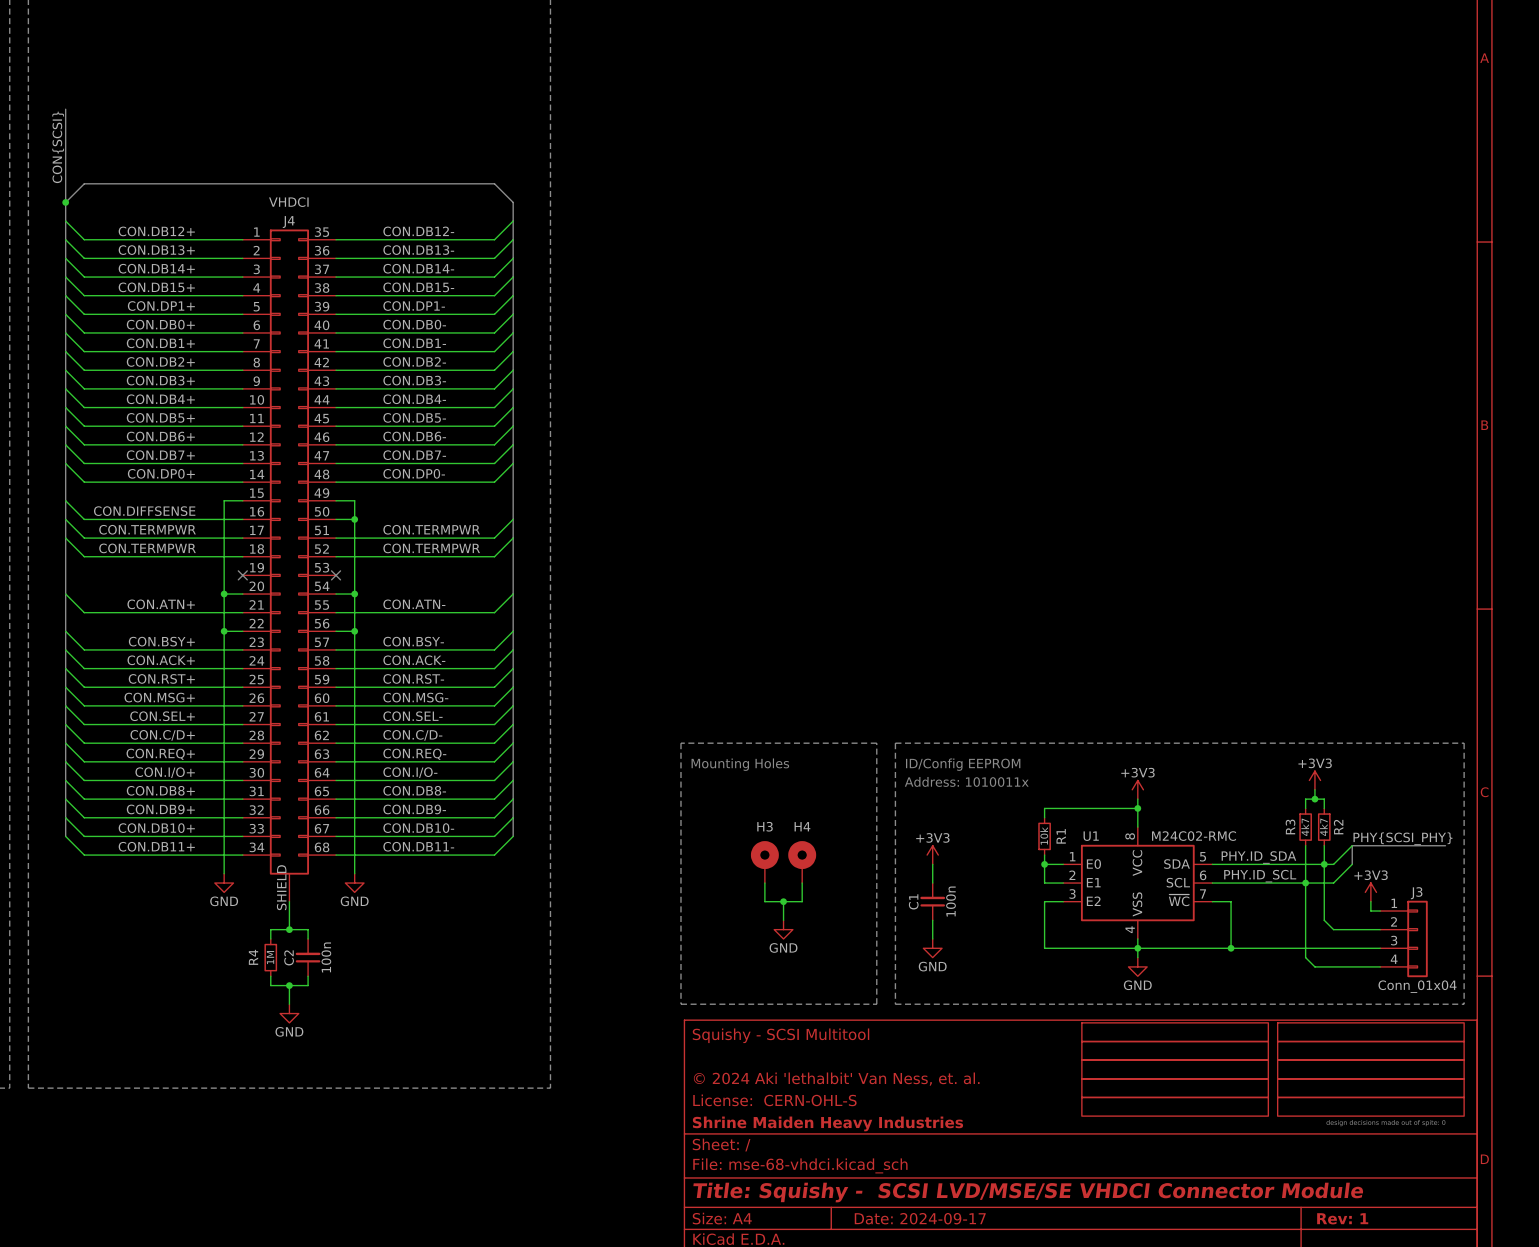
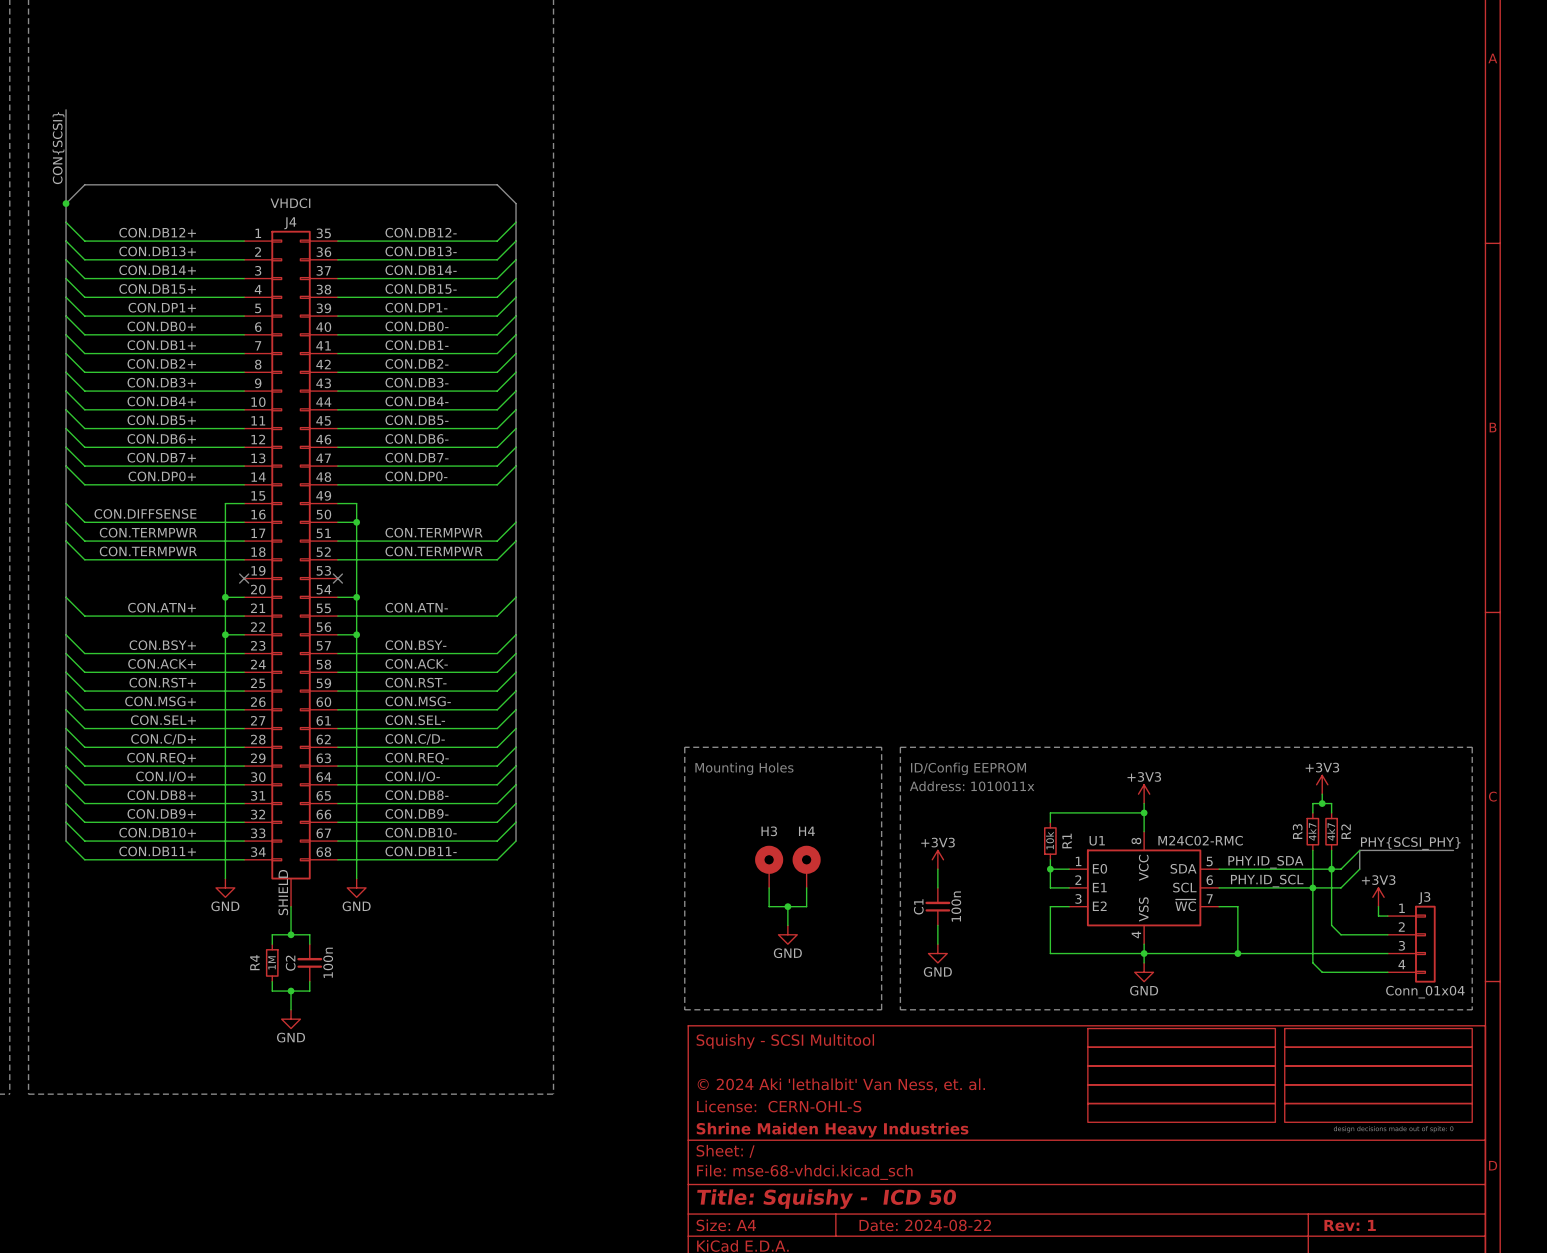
title block: Title: Squishy - SCSI LVD/MSE/SE VHDCI Connector Module (1028, 1192) -> Title: Squishy - ICD 50 (826, 1199)
title block: Date: 2024-09-17 (920, 1218) -> Date: 2024-08-22 (925, 1225)

